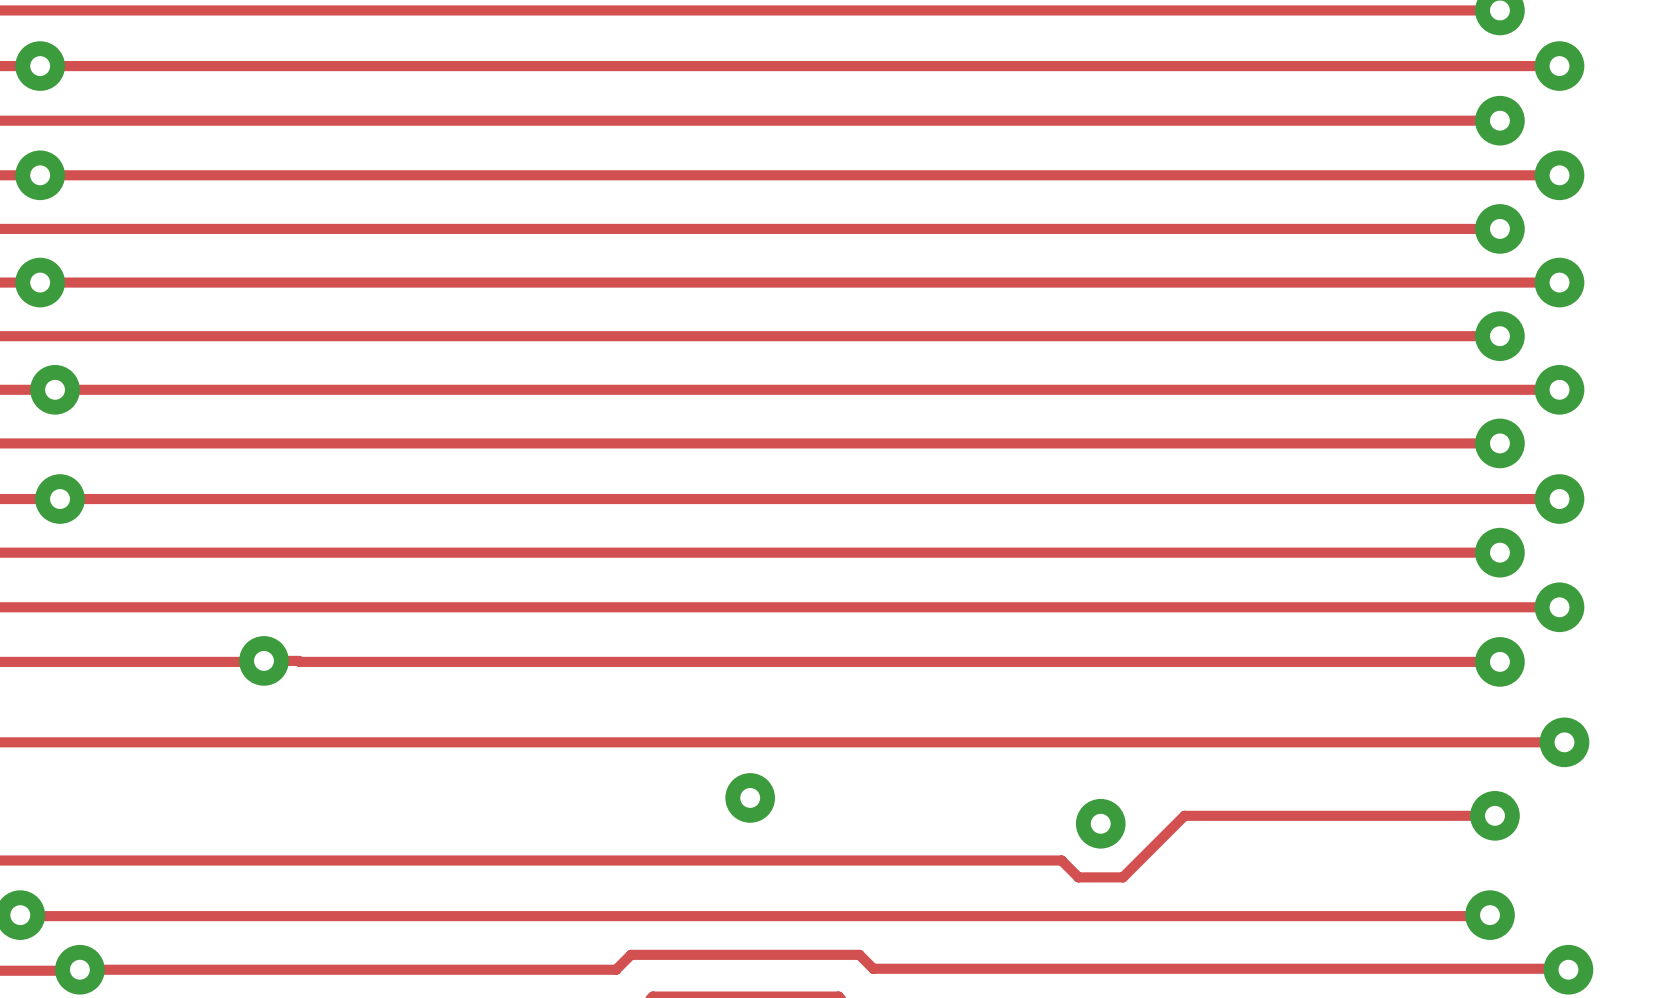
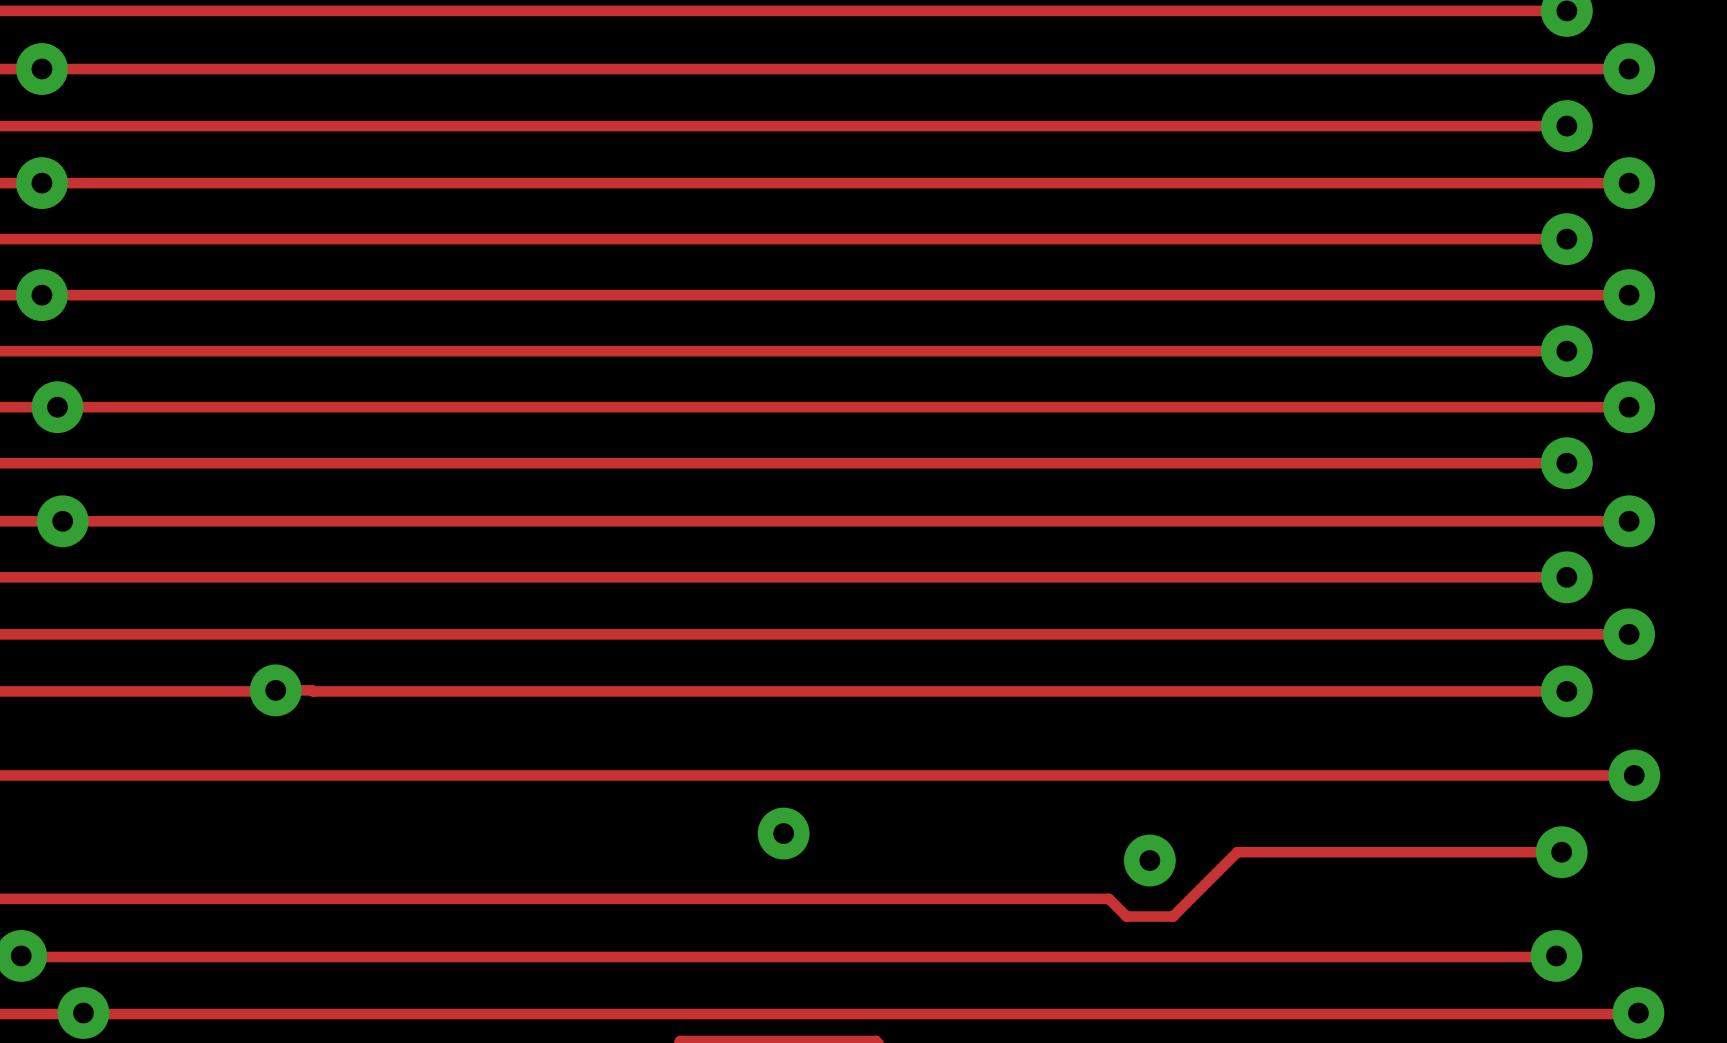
track: (1567, 968) (873, 968) (859, 954) (631, 954) (616, 969) (79, 969) -> (1637, 1014) (84, 1014)

